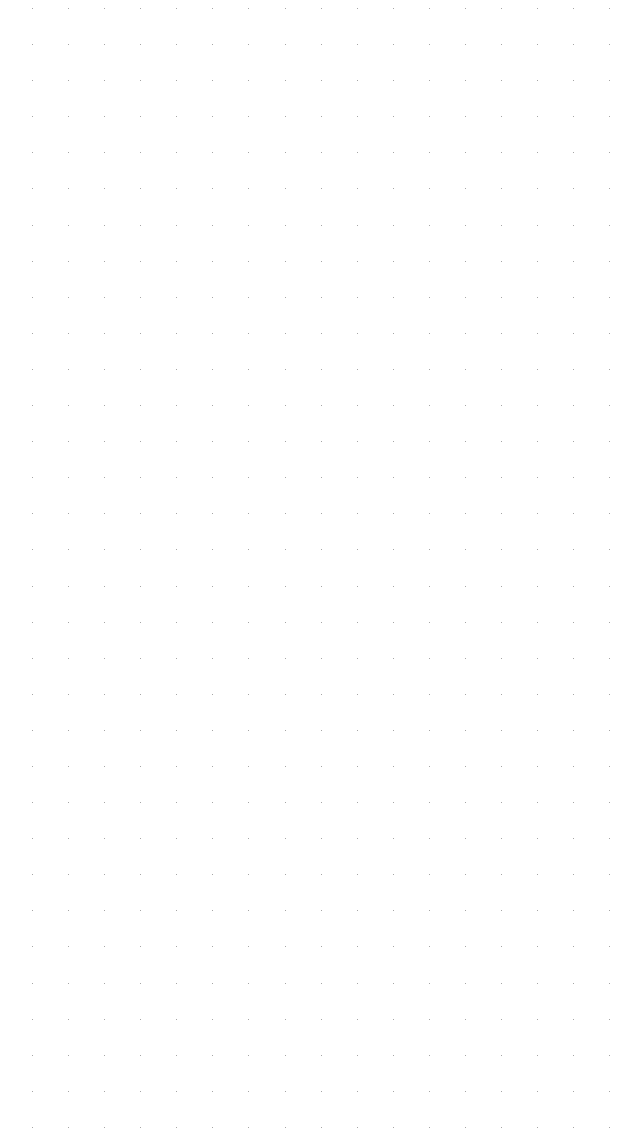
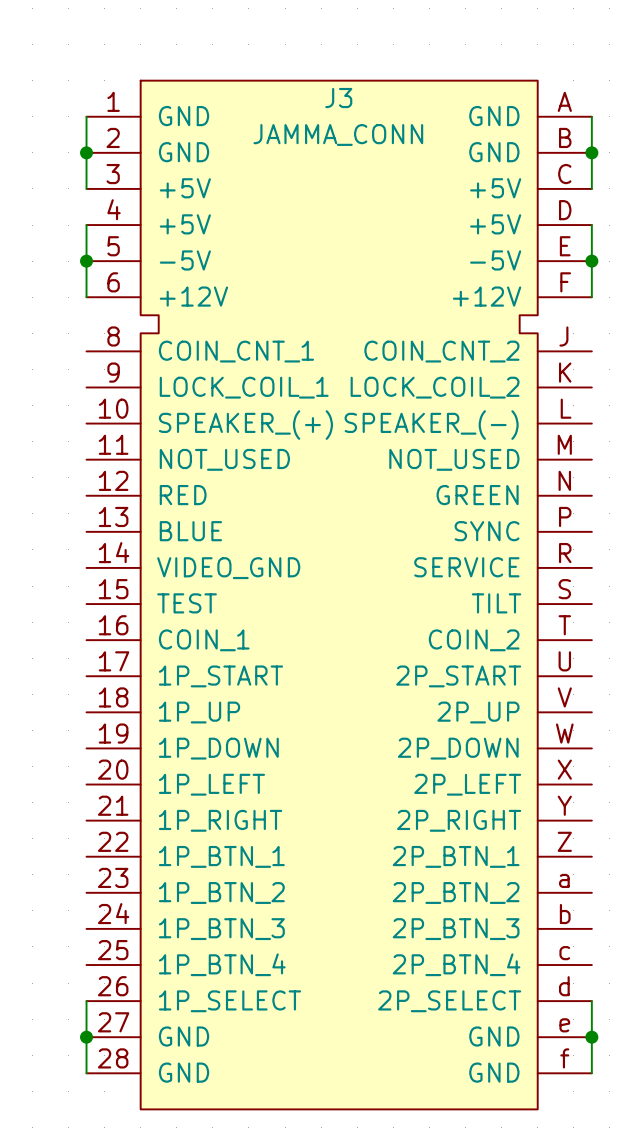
wire: none -> (86, 116) (86, 188)
wire: none -> (591, 116) (591, 188)
junction: none -> (86, 152)
junction: none -> (591, 152)
wire: none -> (86, 225) (86, 297)
wire: none -> (591, 225) (591, 297)
junction: none -> (86, 261)
junction: none -> (591, 261)
J3: none -> JAMMA_CONN (339, 595)
wire: none -> (86, 1001) (86, 1073)
wire: none -> (591, 1001) (591, 1073)
junction: none -> (86, 1037)
junction: none -> (591, 1037)

